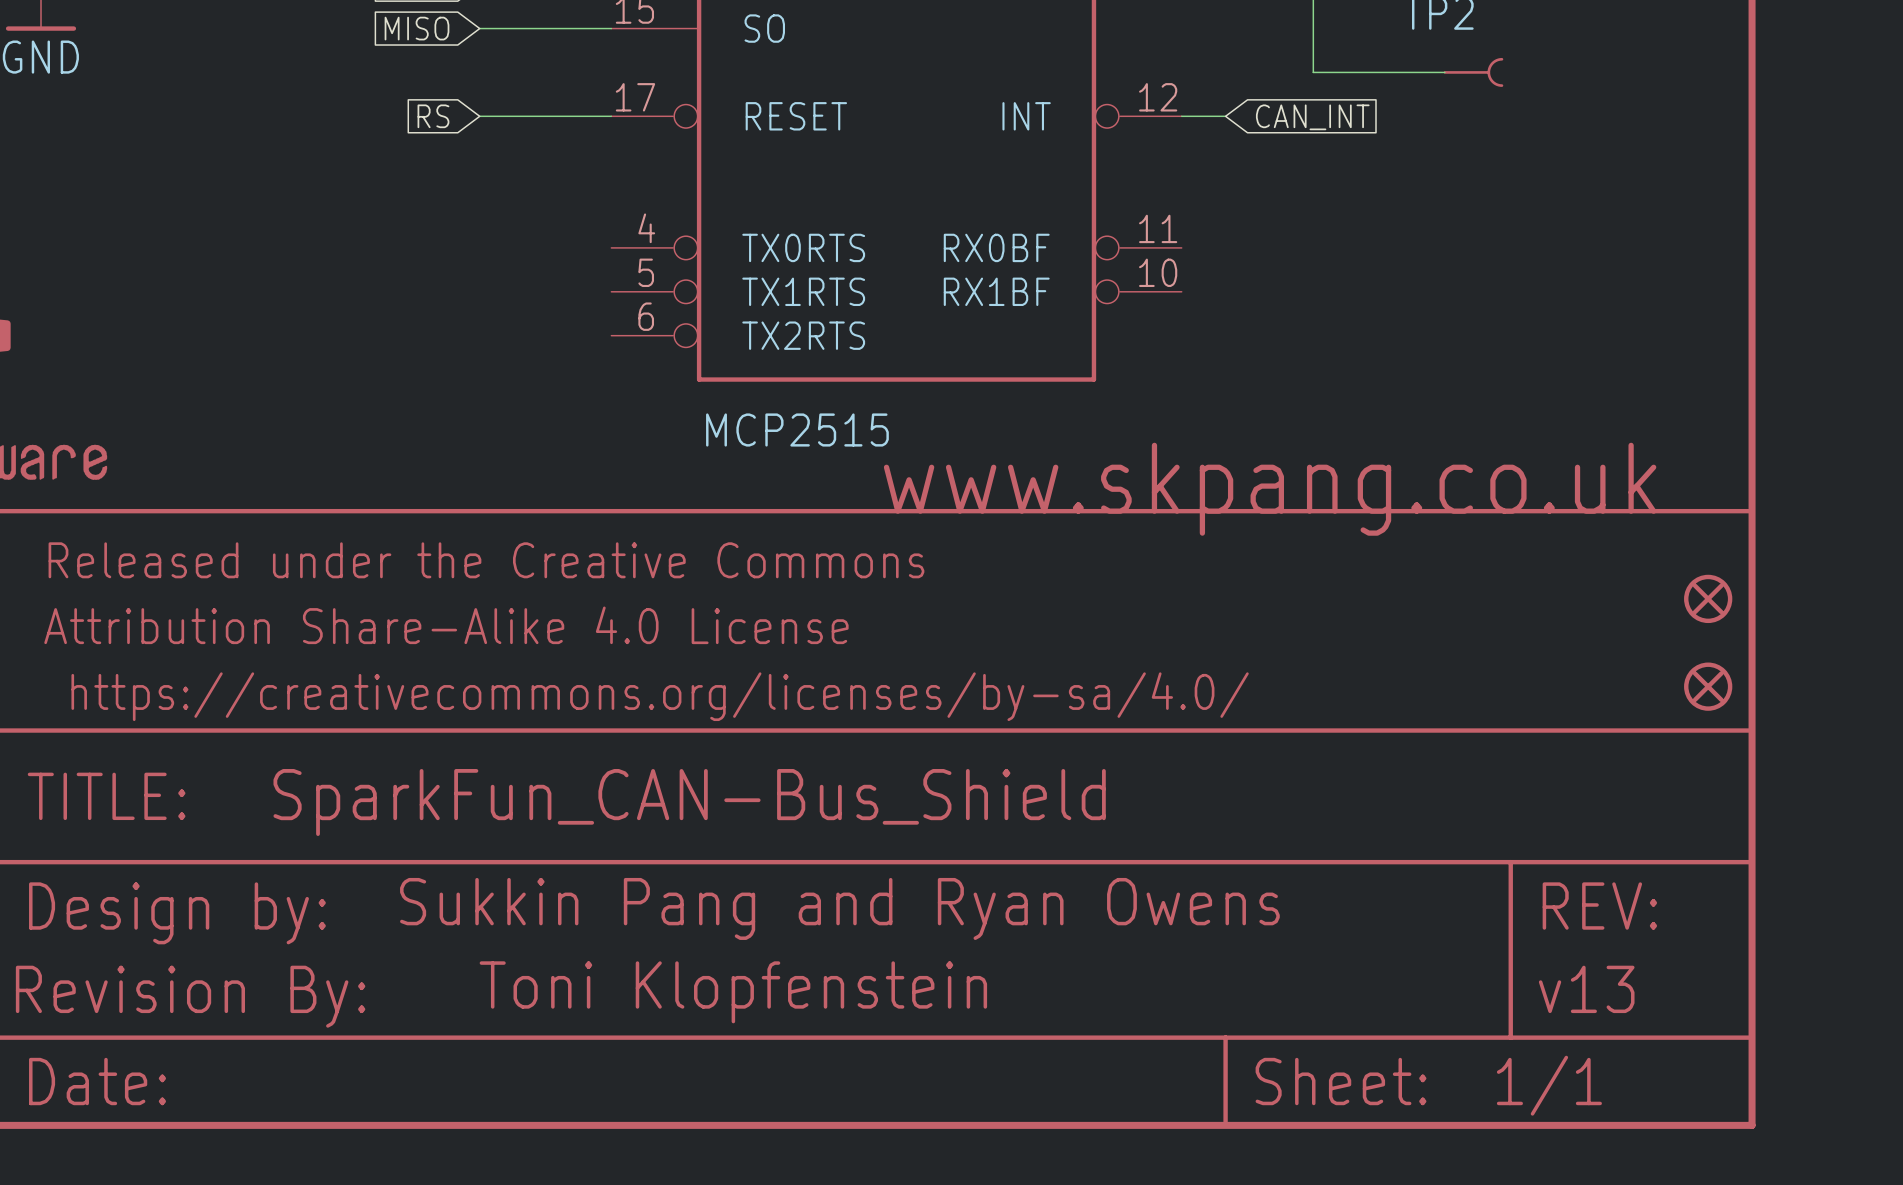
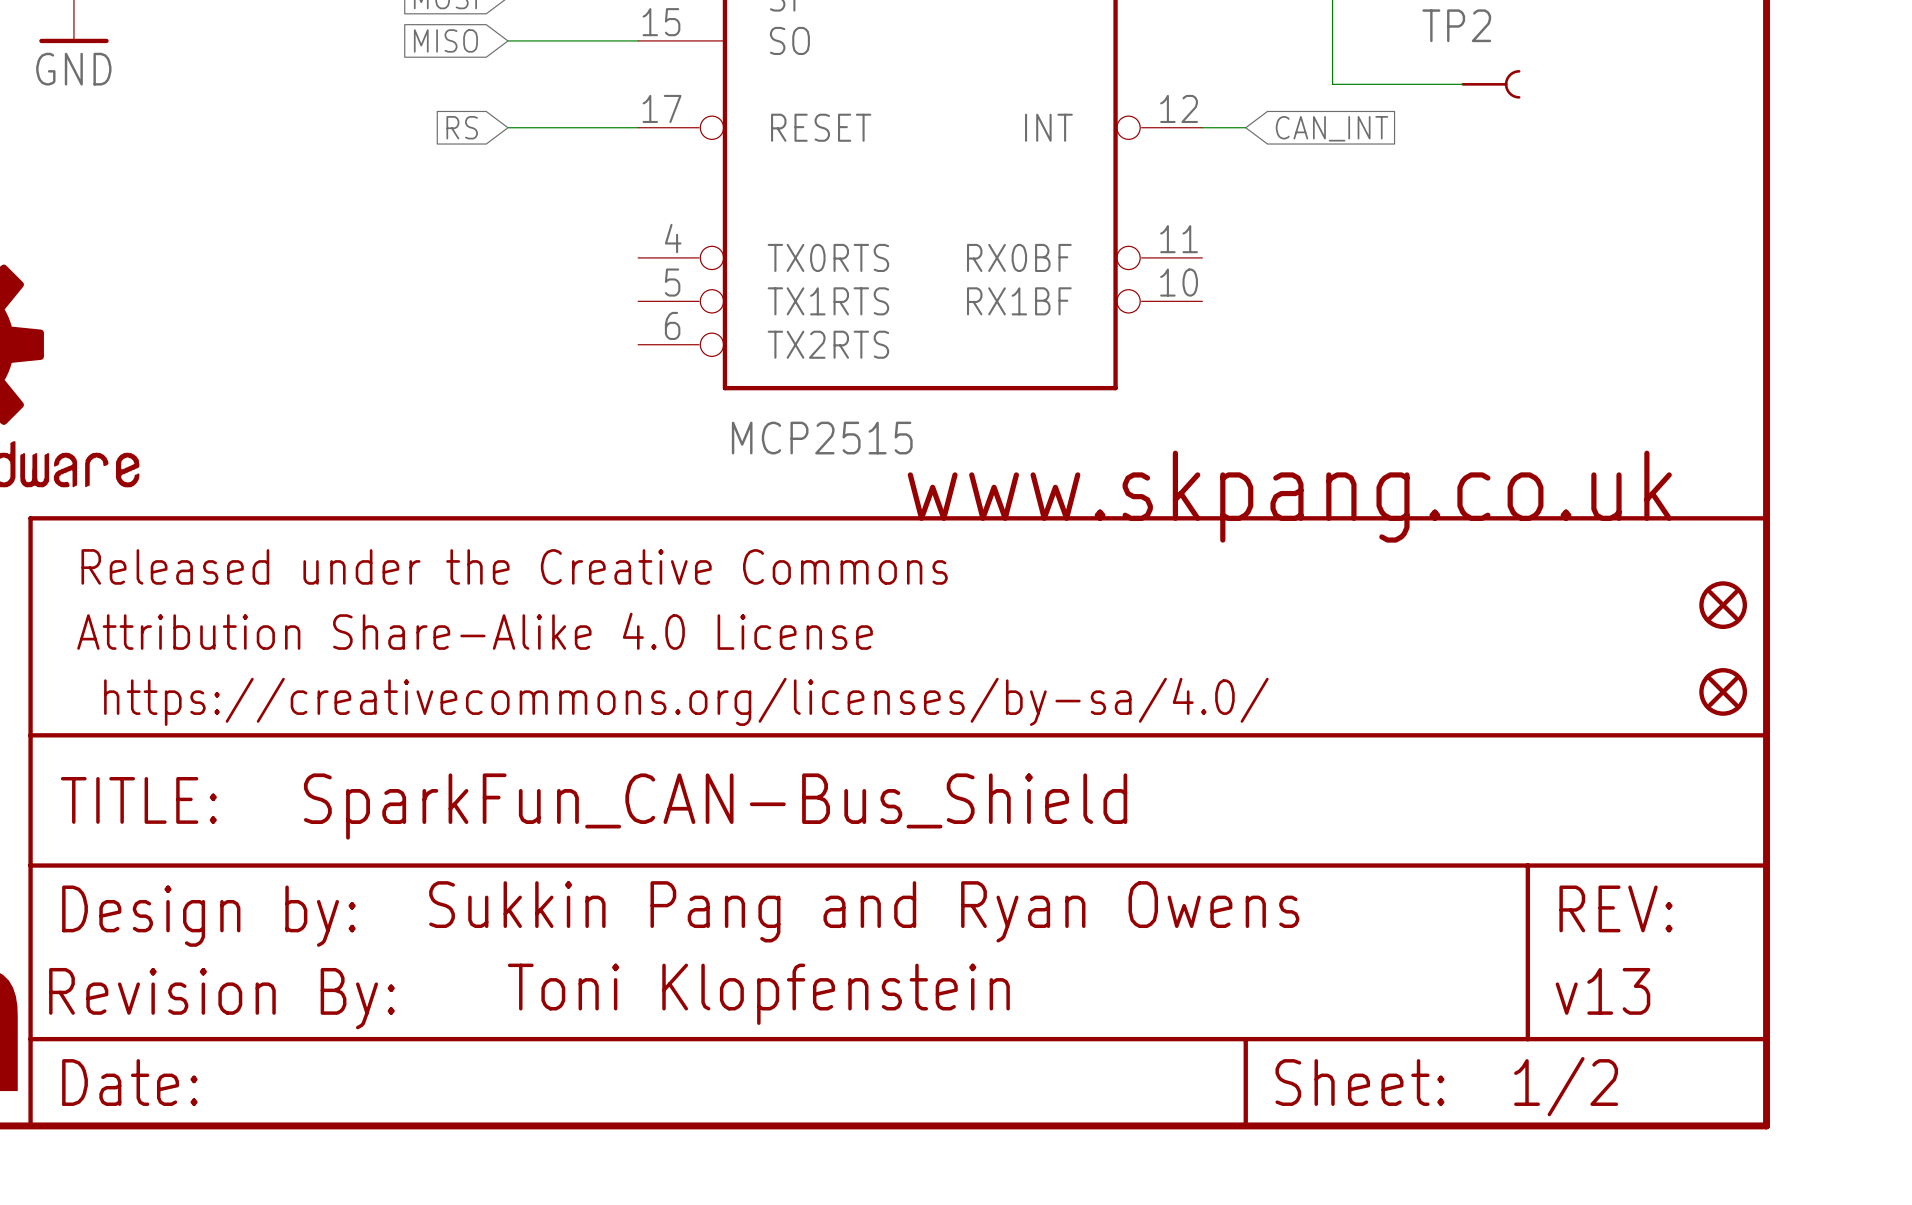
part text: 1/1 (1549, 1085) -> 1/2 (1566, 1086)

